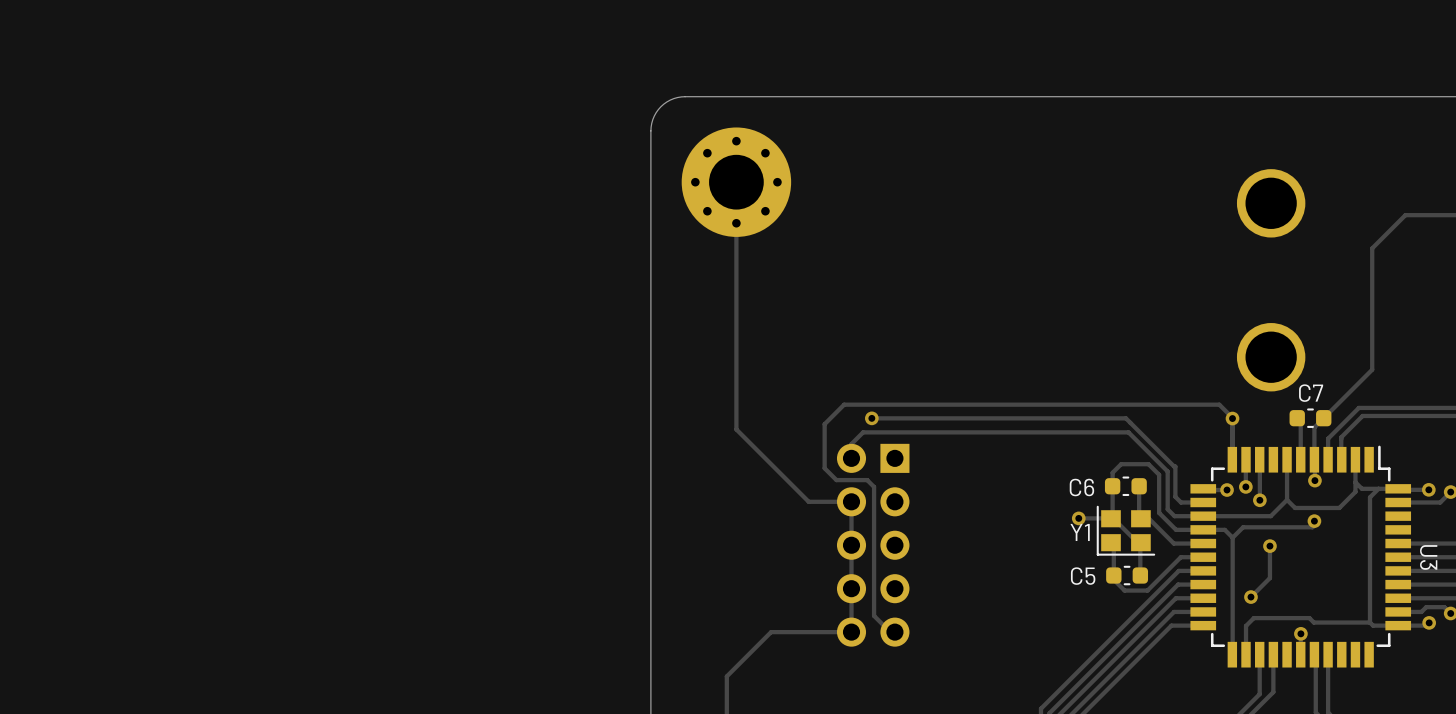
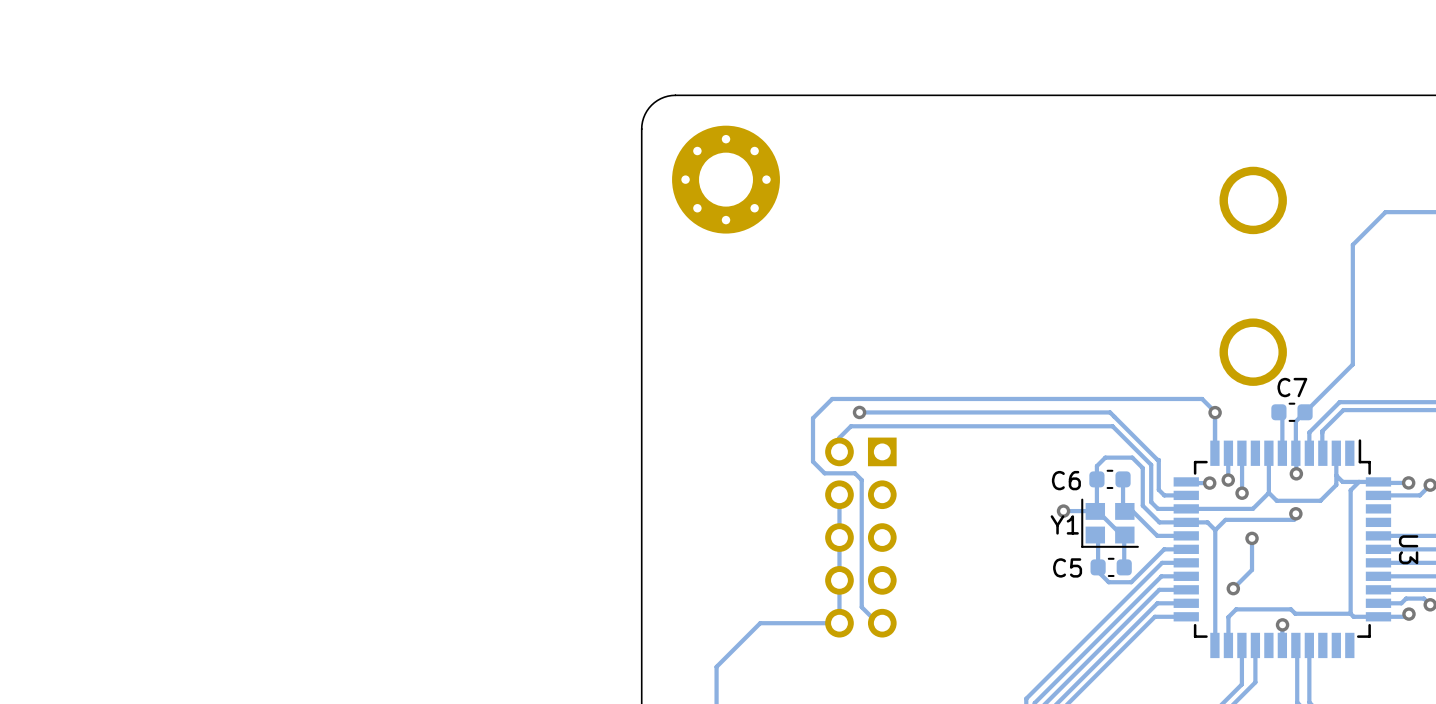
track: (736, 182) (736, 429) (808, 501) (851, 501) -> none

